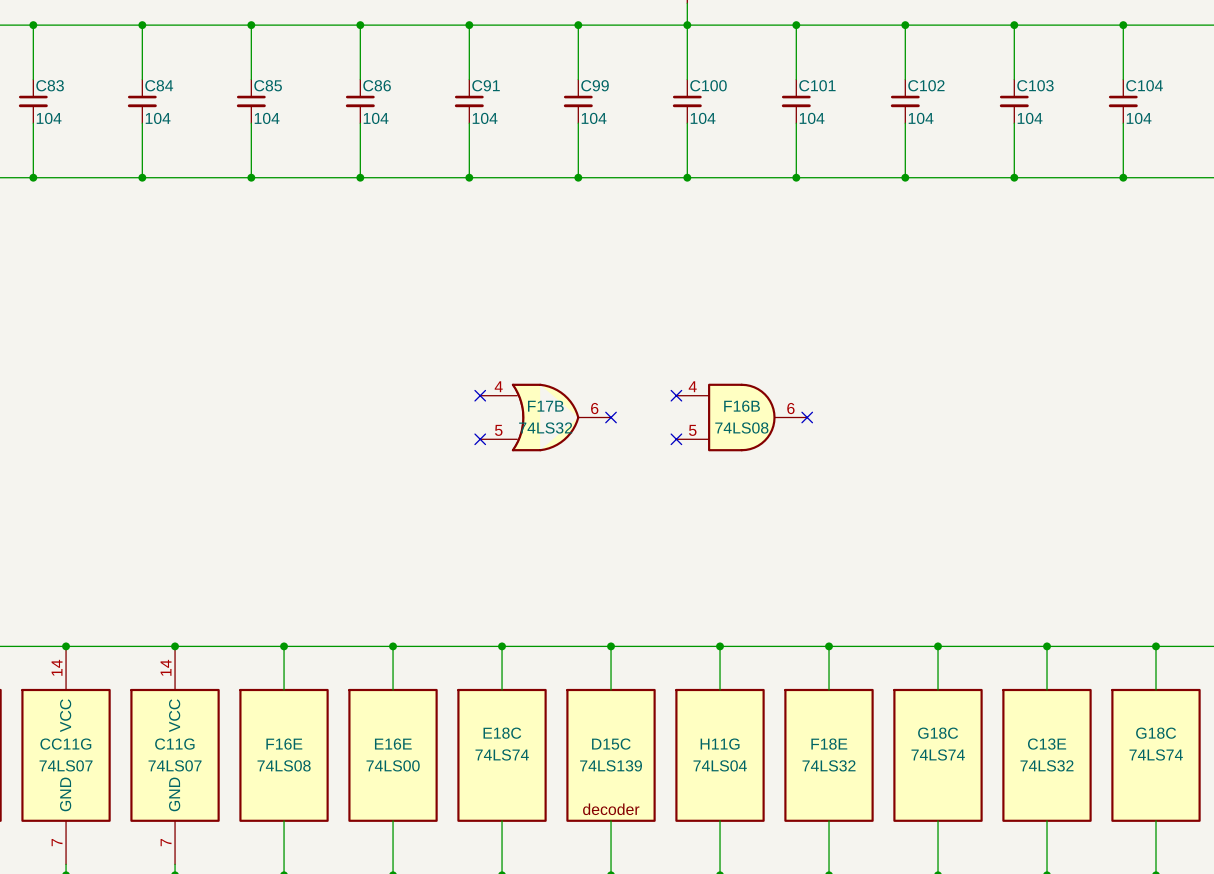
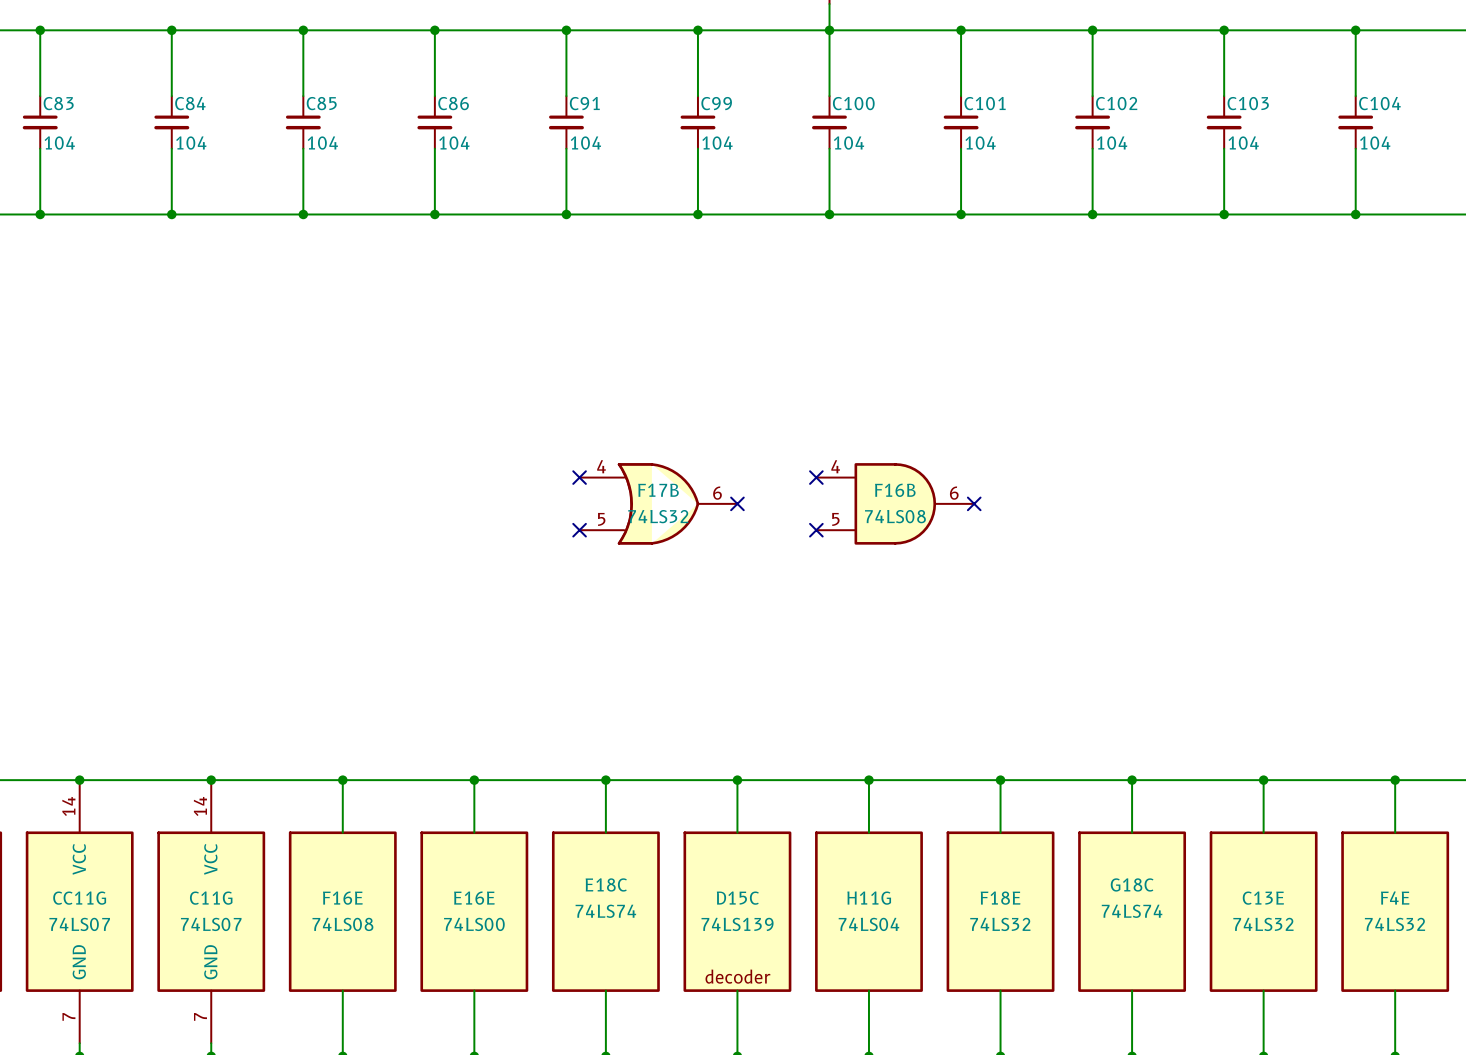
G18C name: G18C (1156, 733) -> F4E (1395, 898)
G18C value: 74LS74 (1156, 754) -> 74LS32 (1394, 924)

